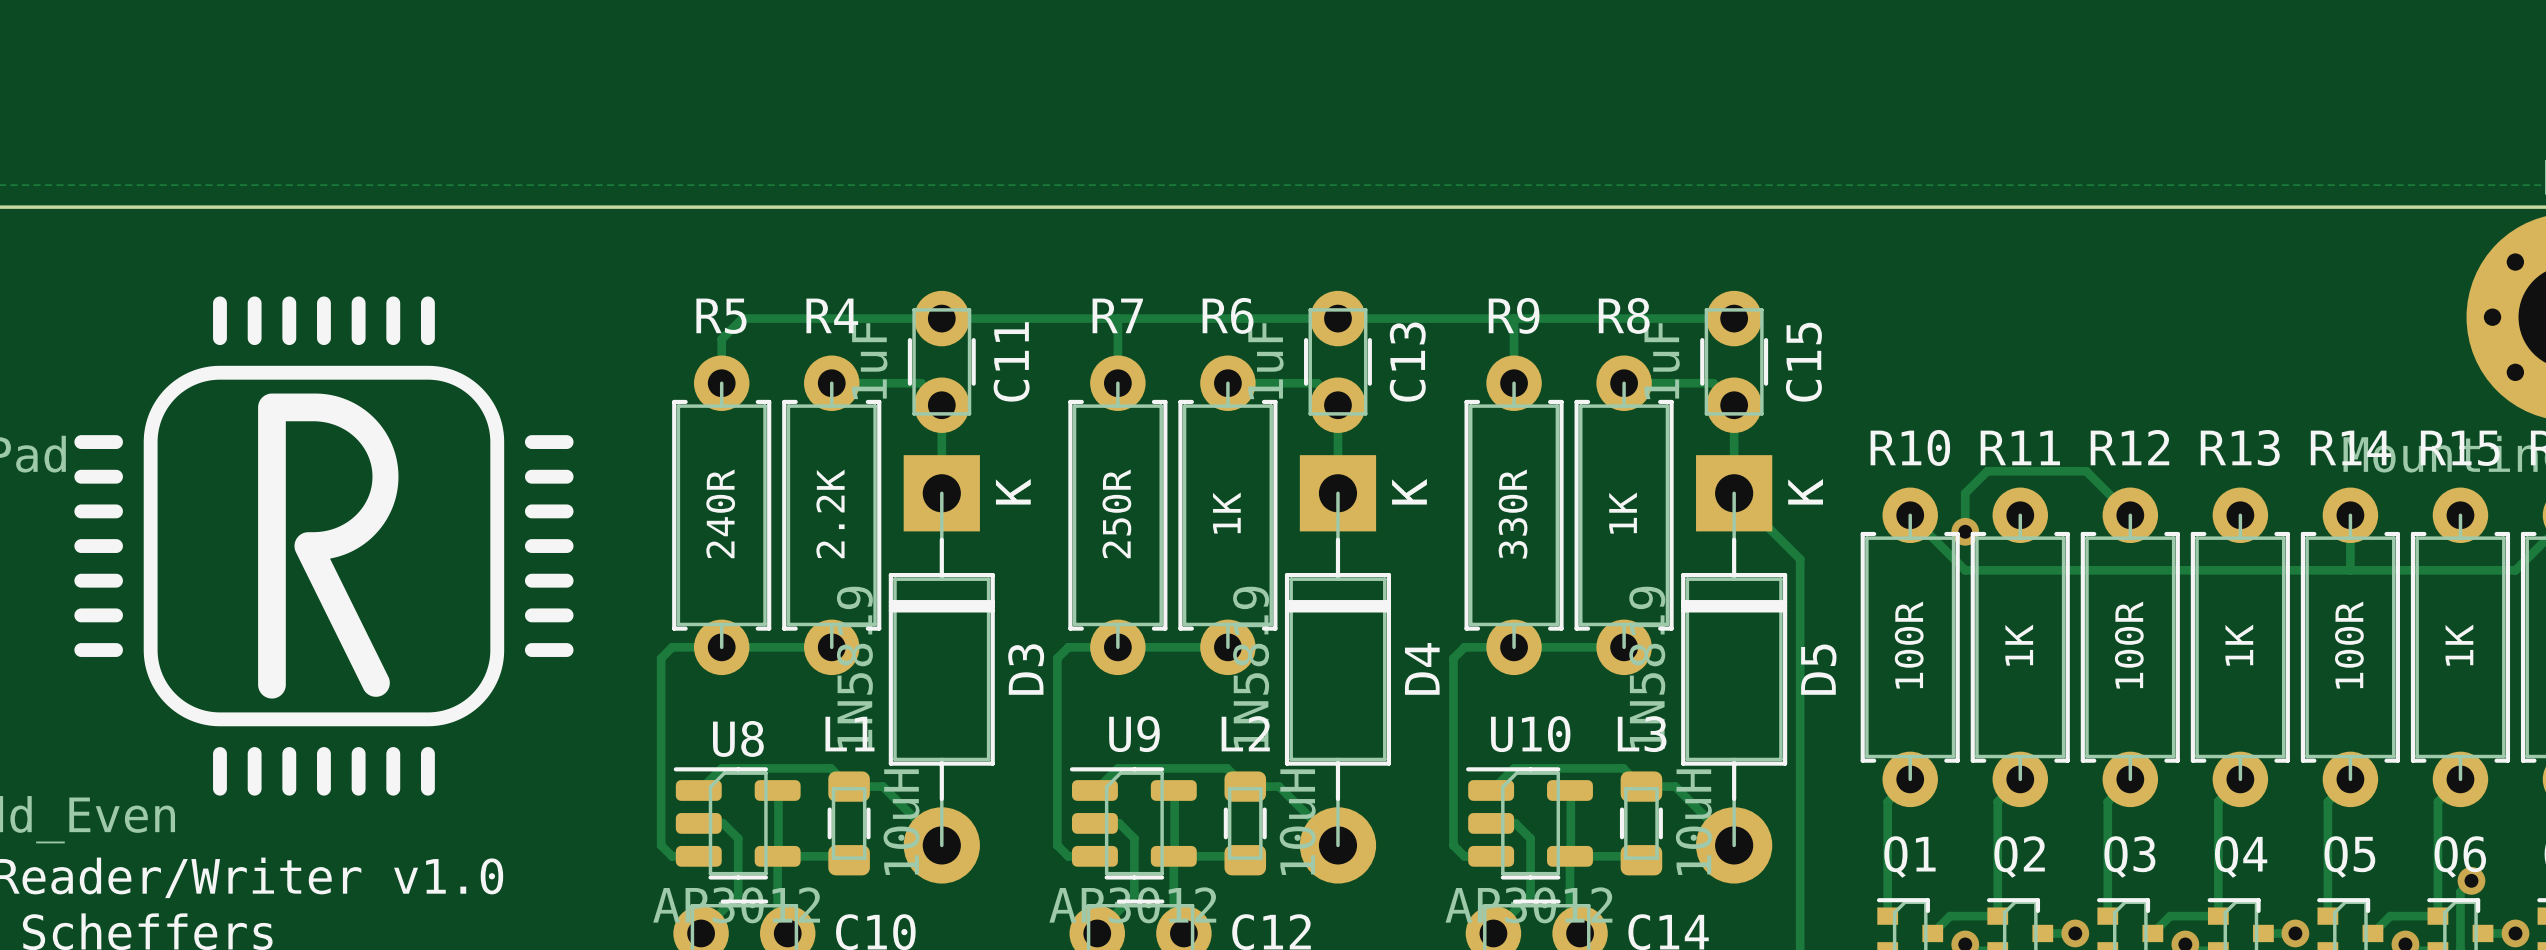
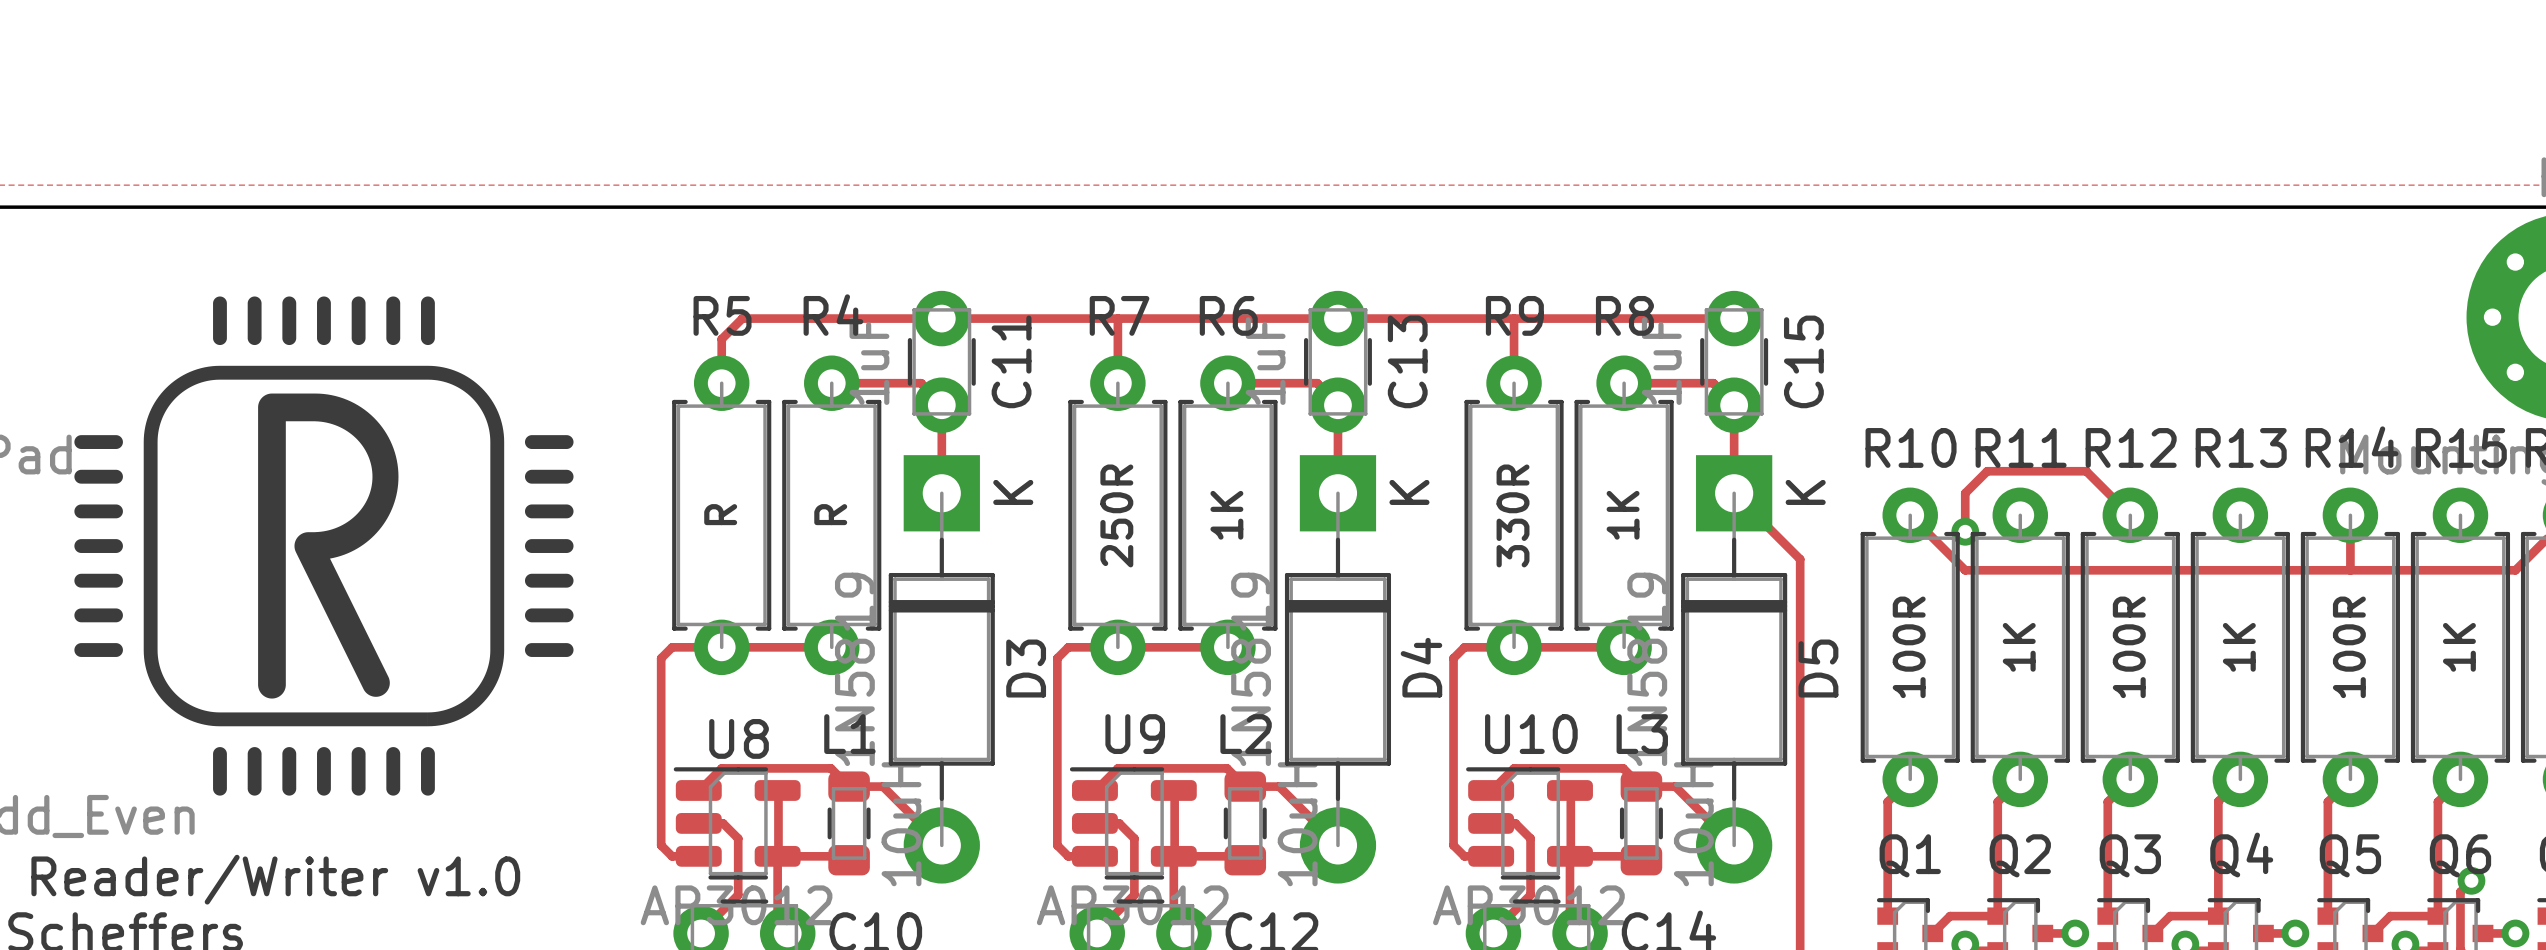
R5 value: 240R (720, 513) -> R (720, 514)
R4 value: 2.2K (830, 513) -> R (830, 514)

